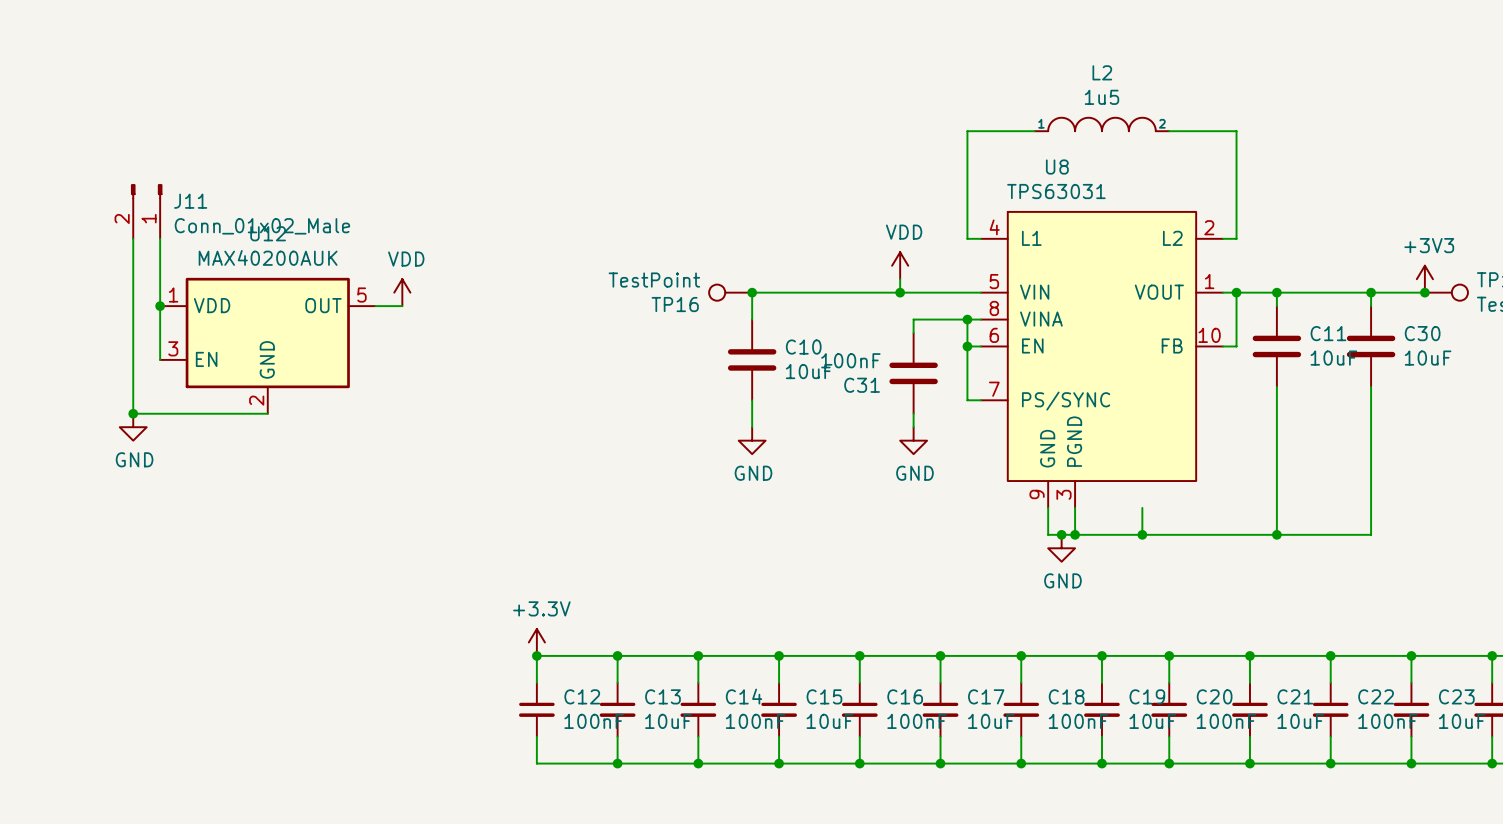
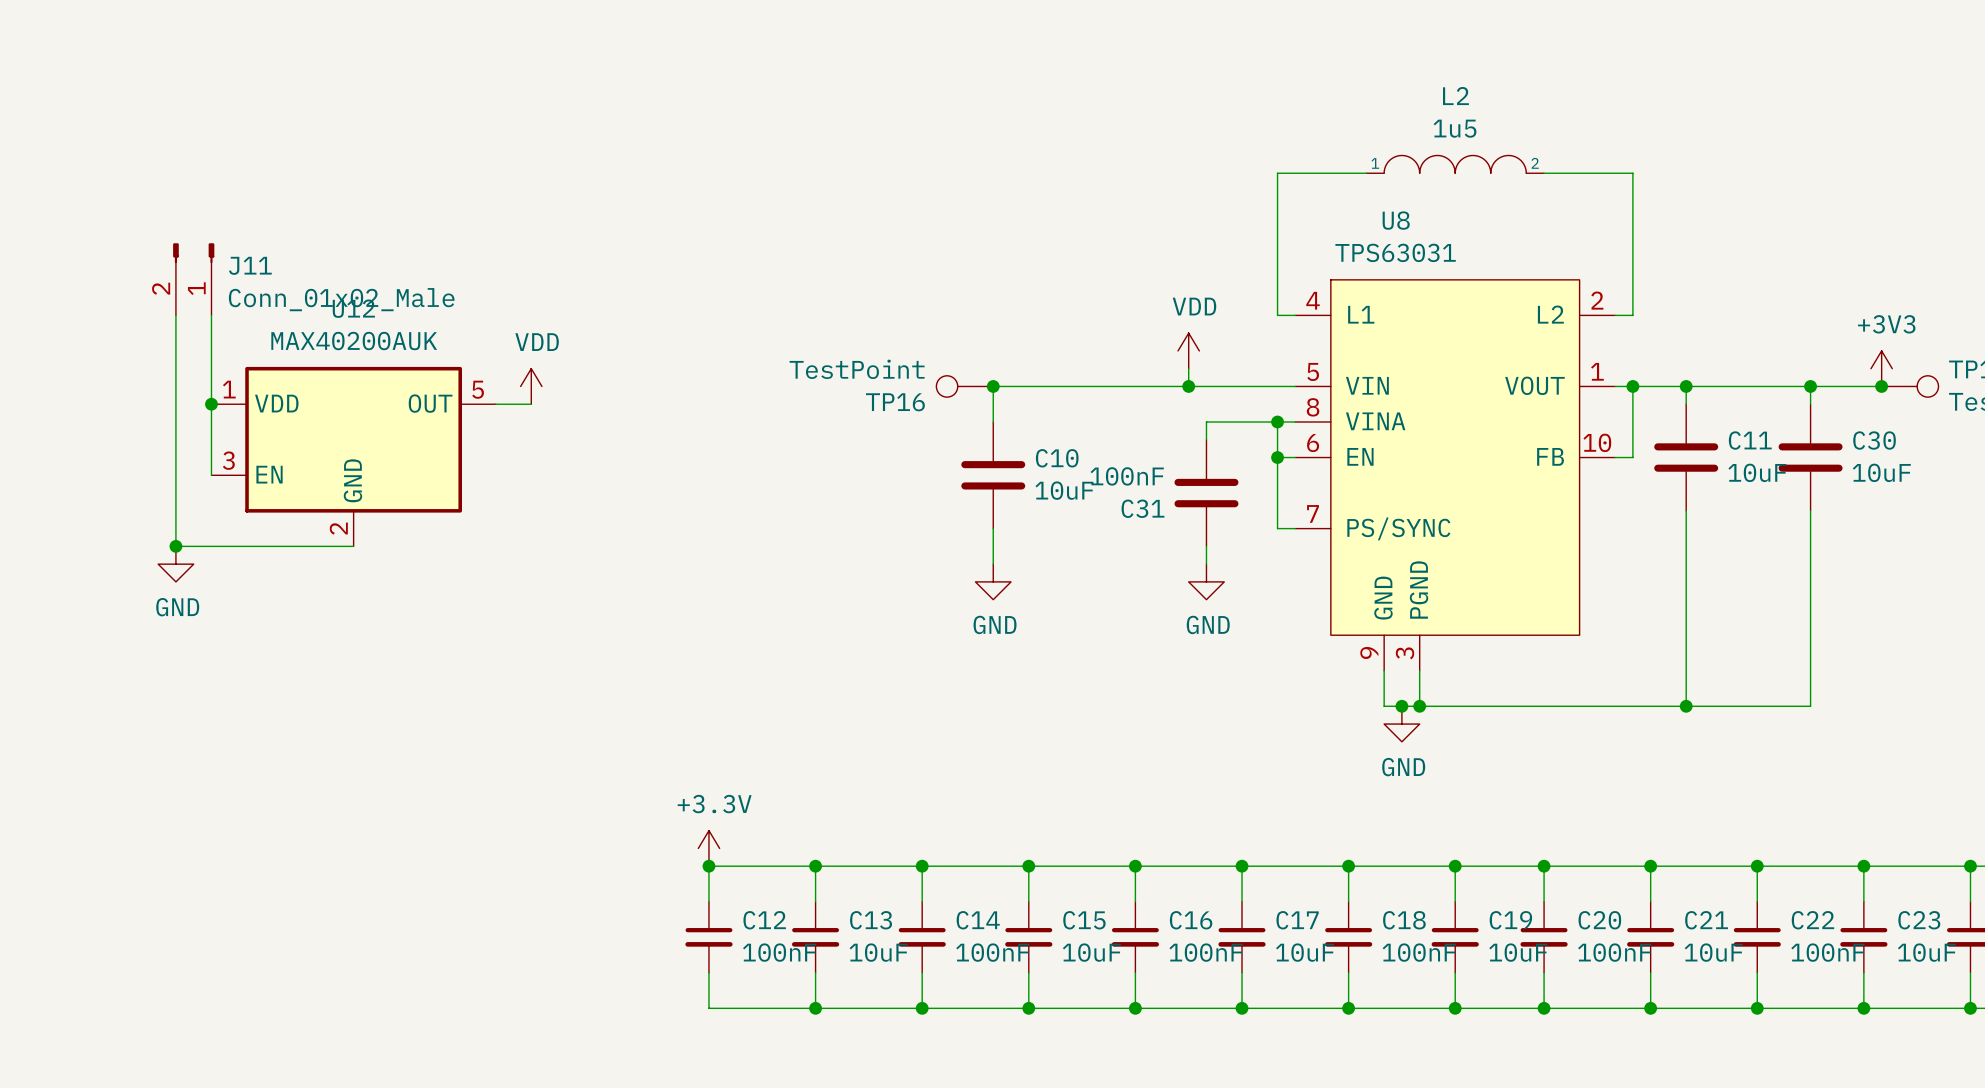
wire: (1142, 507) (1142, 534) -> none
junction: (1142, 534) -> none

